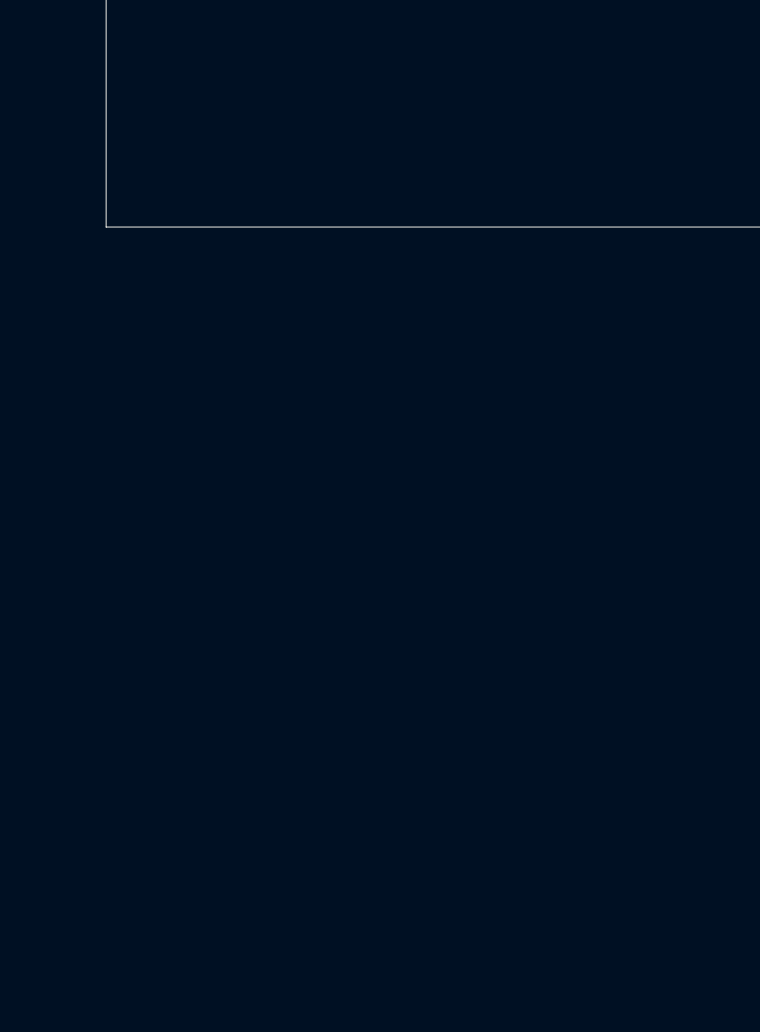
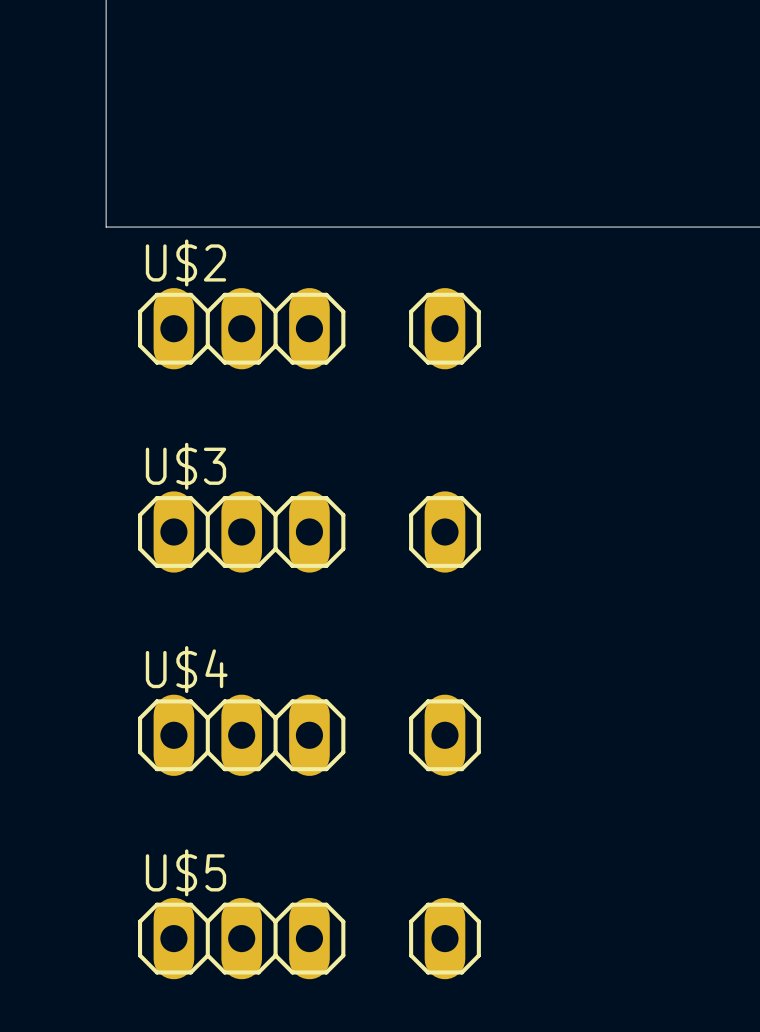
U$2: none -> (309, 328)
U$3: none -> (309, 531)
U$4: none -> (309, 735)
U$5: none -> (309, 938)

